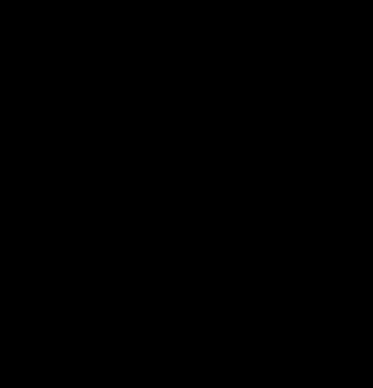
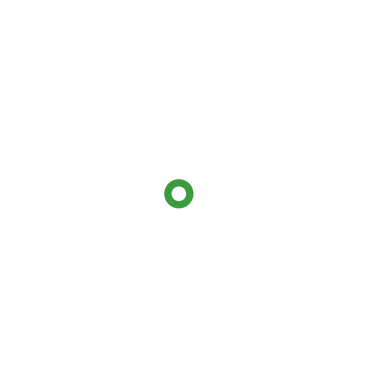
via: none -> (178, 193)

